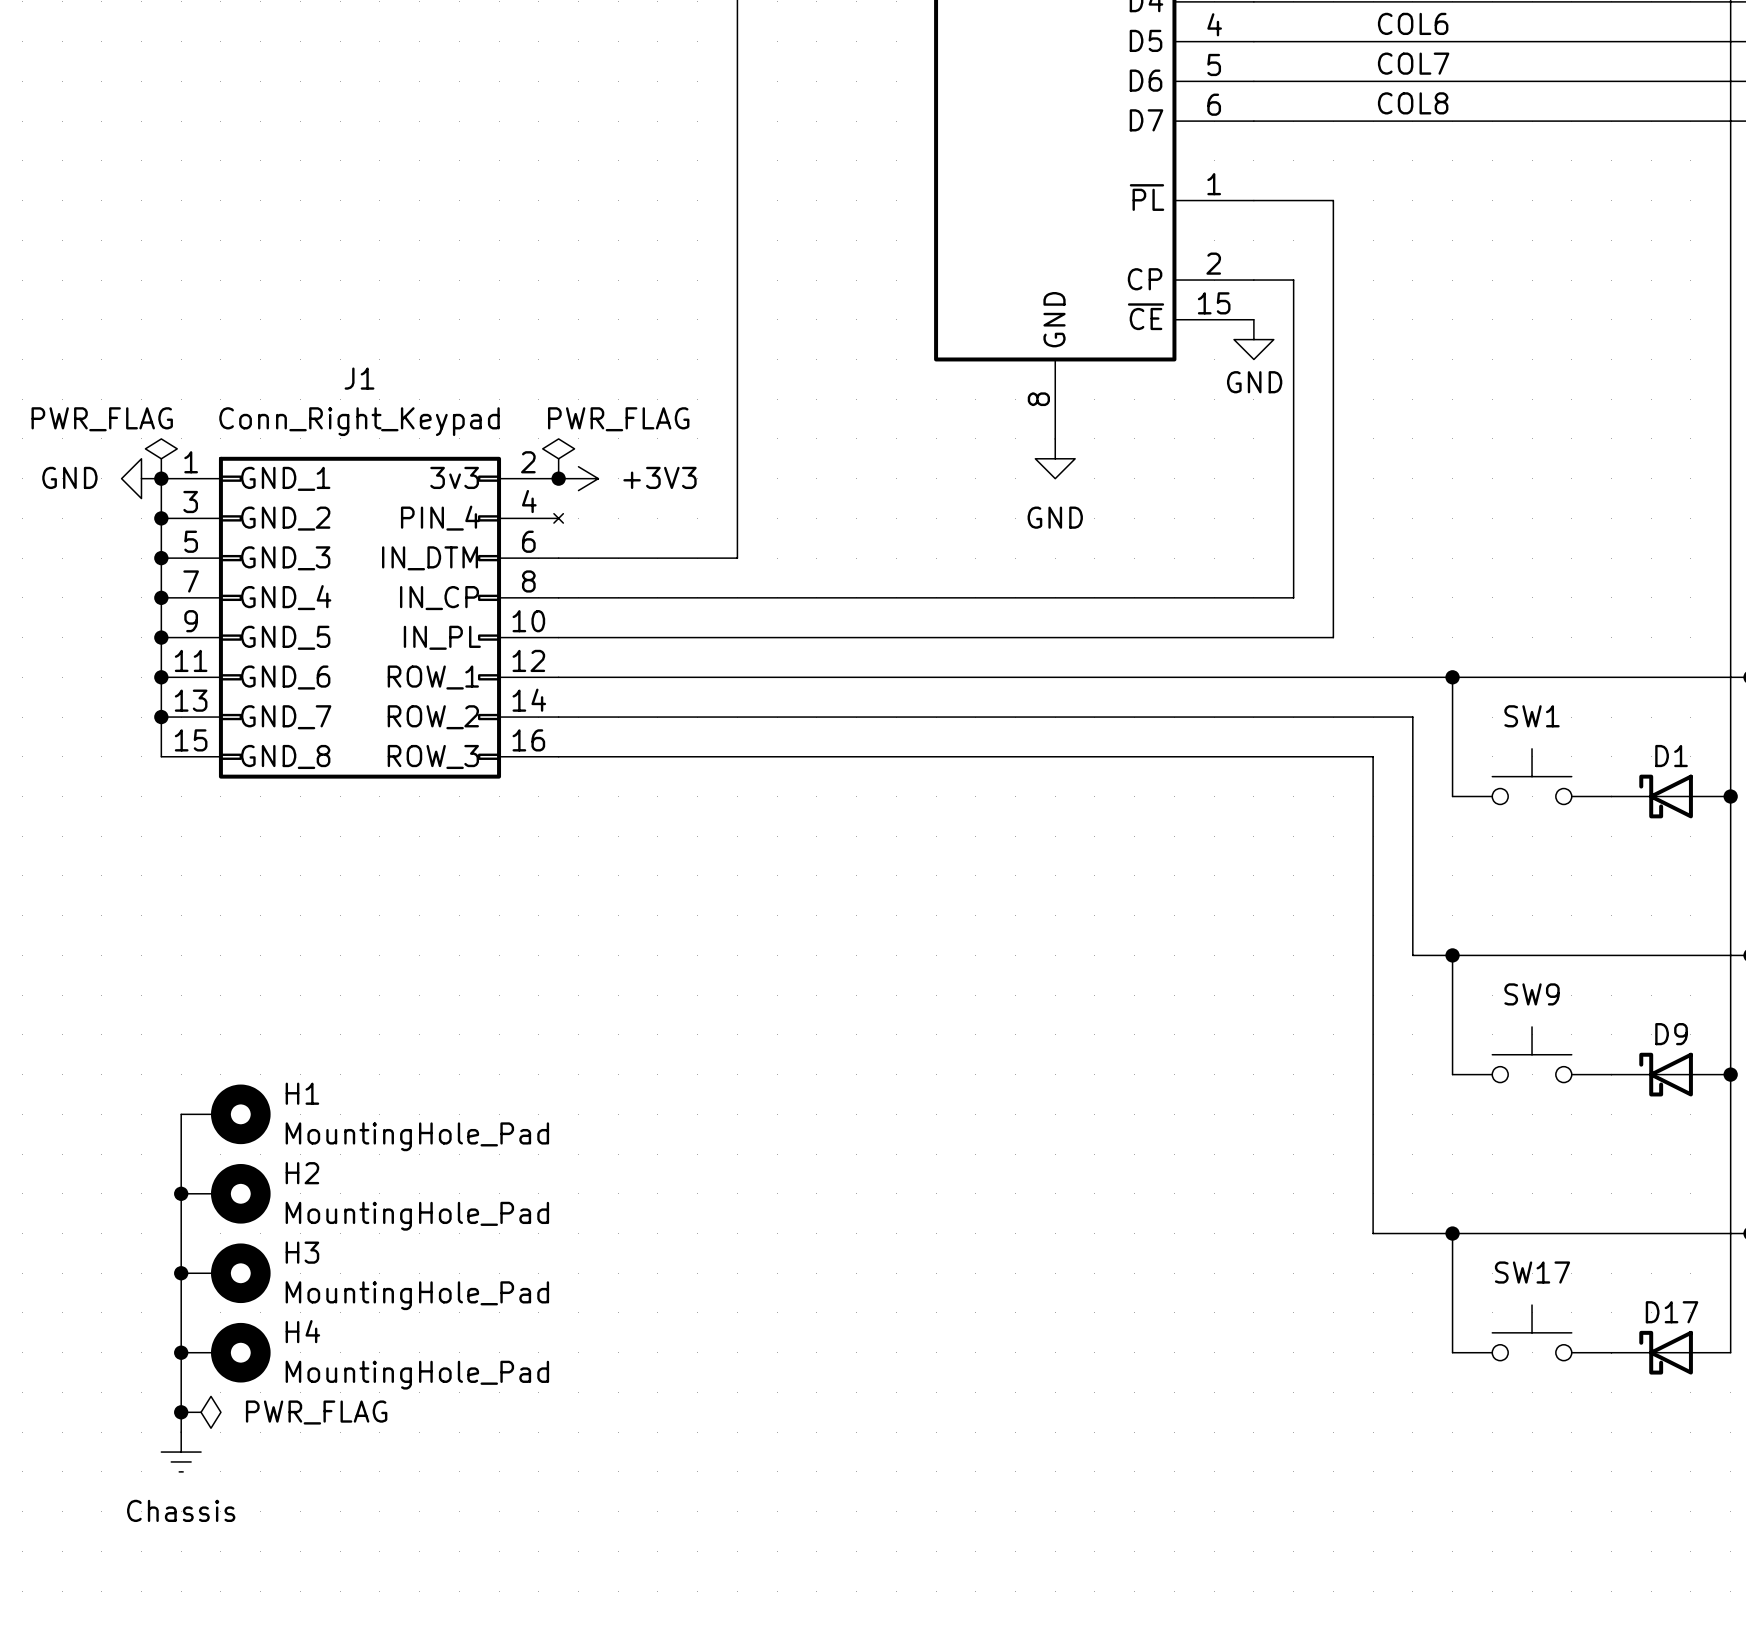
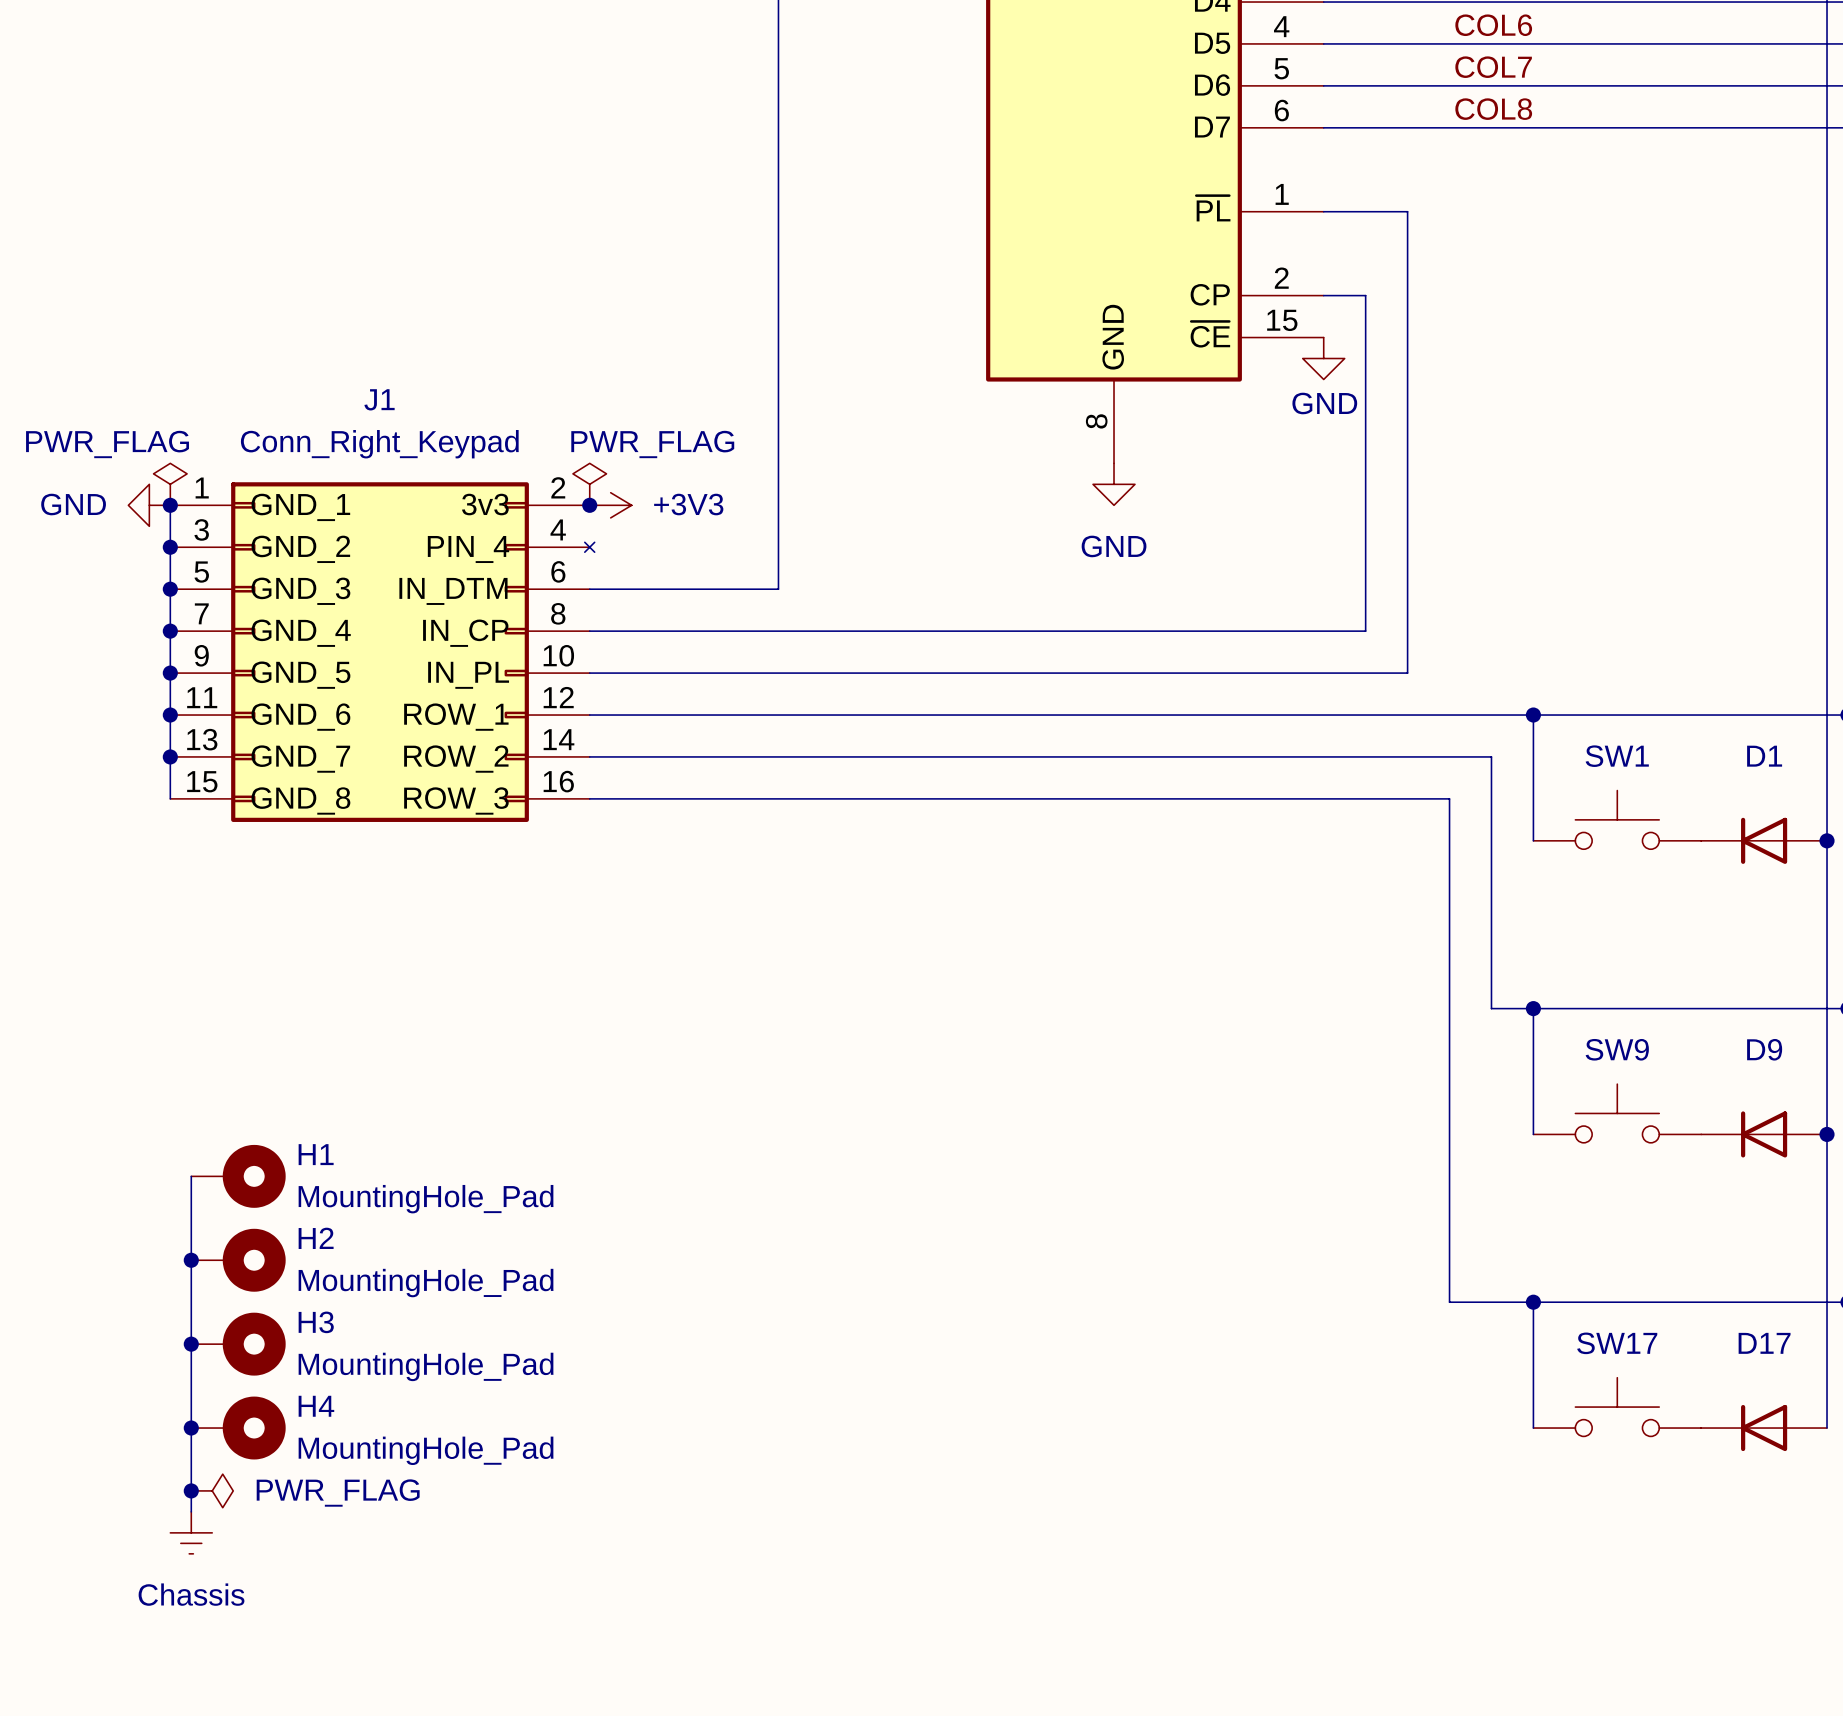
D1 name position: D1 (1671, 756) -> D1 (1764, 756)
D1 symbol: [1611, 774, 1731, 819] -> [1701, 817, 1828, 864]
D9 name position: D9 (1671, 1034) -> D9 (1764, 1049)
D9 symbol: [1611, 1052, 1731, 1097] -> [1701, 1111, 1828, 1158]
D17 name position: D17 (1672, 1312) -> D17 (1764, 1343)
D17 symbol: [1611, 1330, 1731, 1375] -> [1701, 1404, 1828, 1452]

